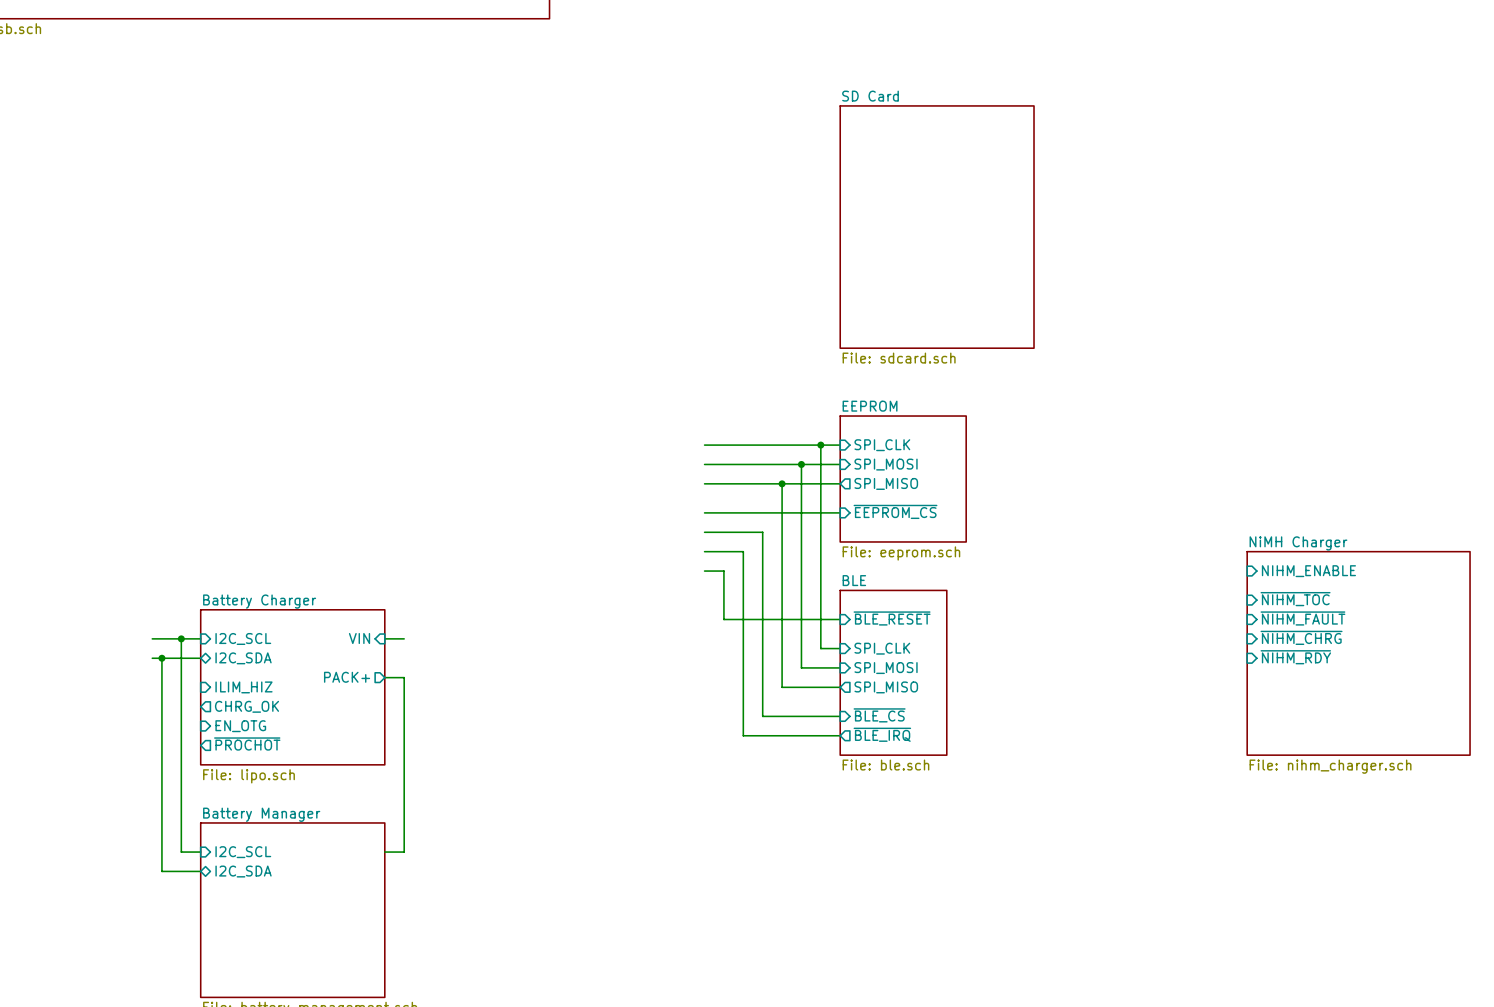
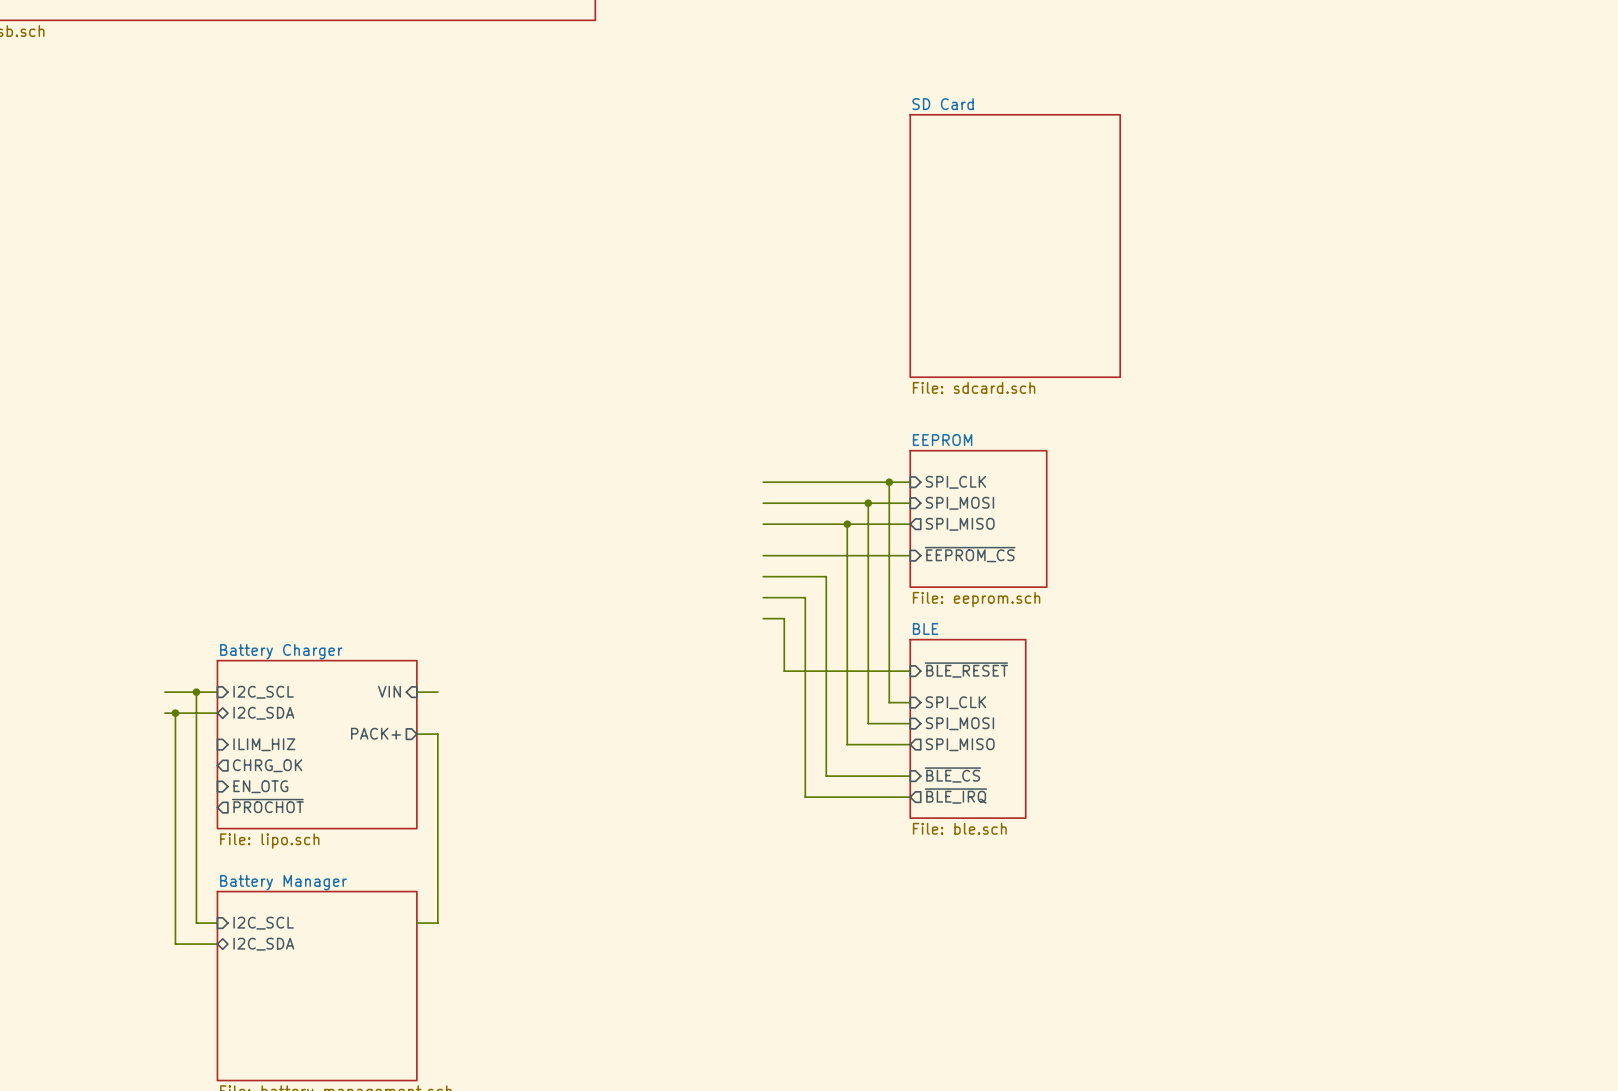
sheet pin: NIHM_ENABLE (1308, 571) -> none
sheet pin: ~{NIHM_TOC} (1295, 599) -> none
sheet pin: ~{NIHM_FAULT} (1302, 618) -> none
sheet pin: ~{NIHM_CHRG} (1301, 637) -> none
sheet NiMH Charger: File: nihm_charger.sch (1358, 653) -> none
sheet pin: ~{NIHM_RDY} (1295, 657) -> none

